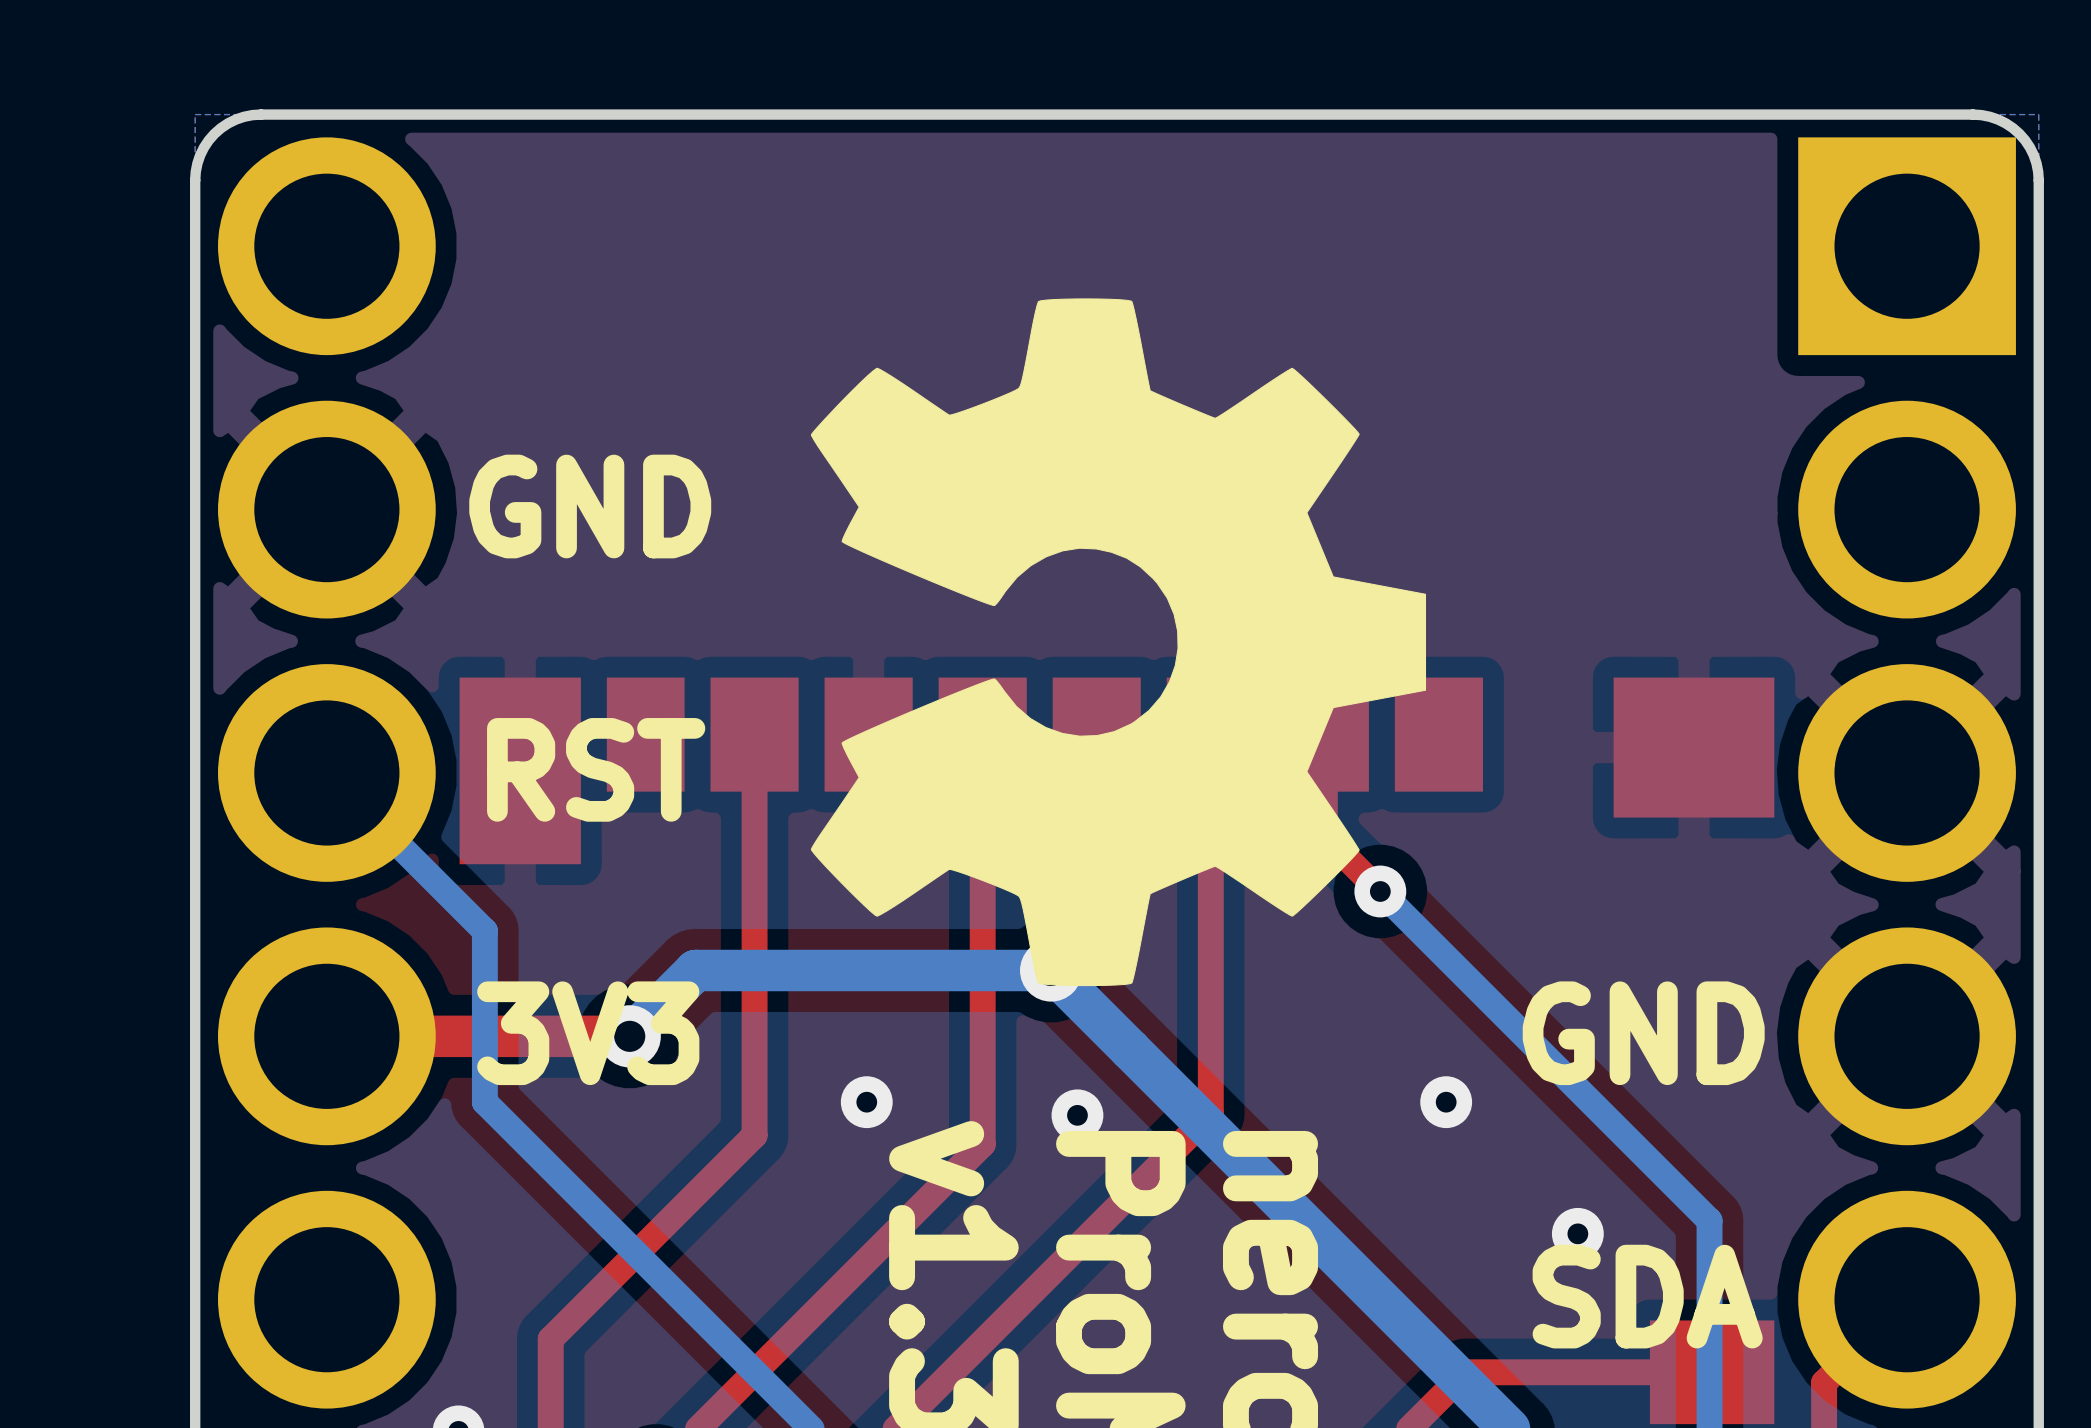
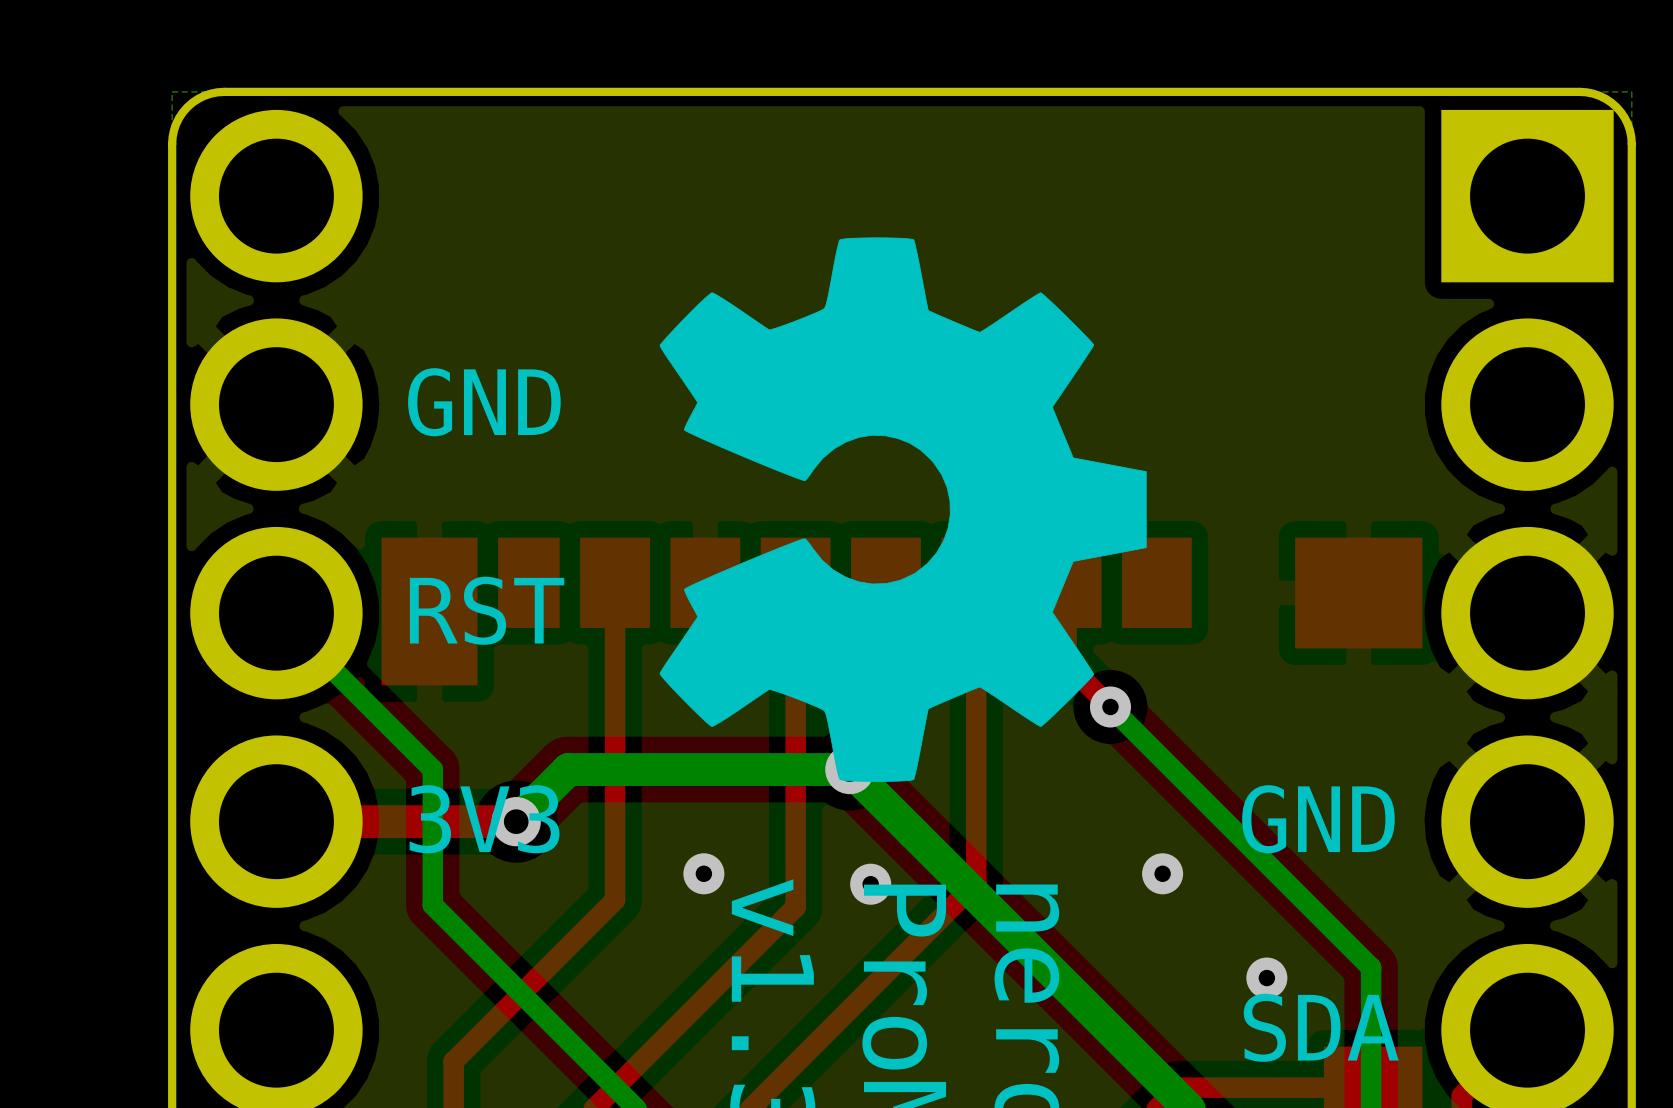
bottom track: (484, 930) (484, 1102) (524, 1141) -> (401, 738) (432, 769) (432, 905)

